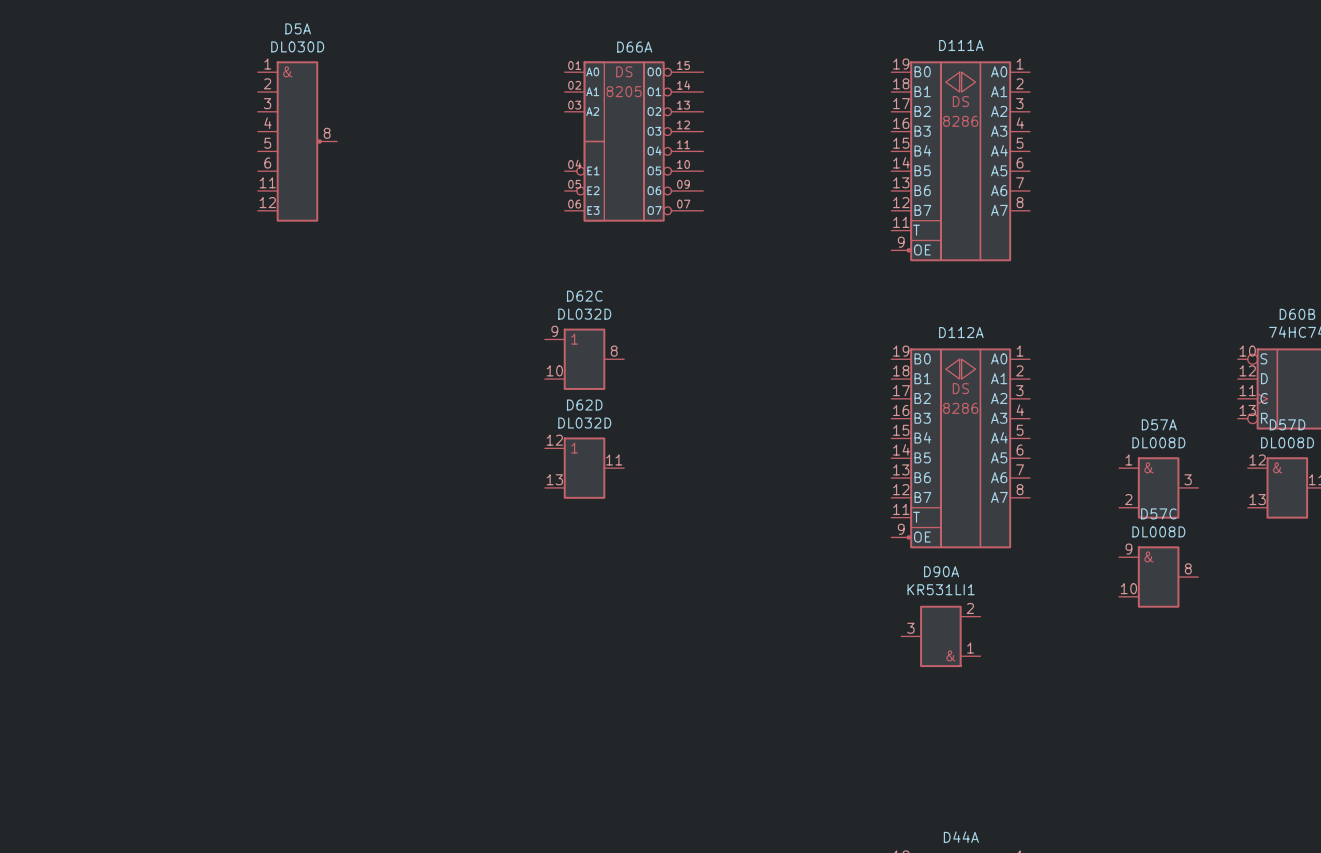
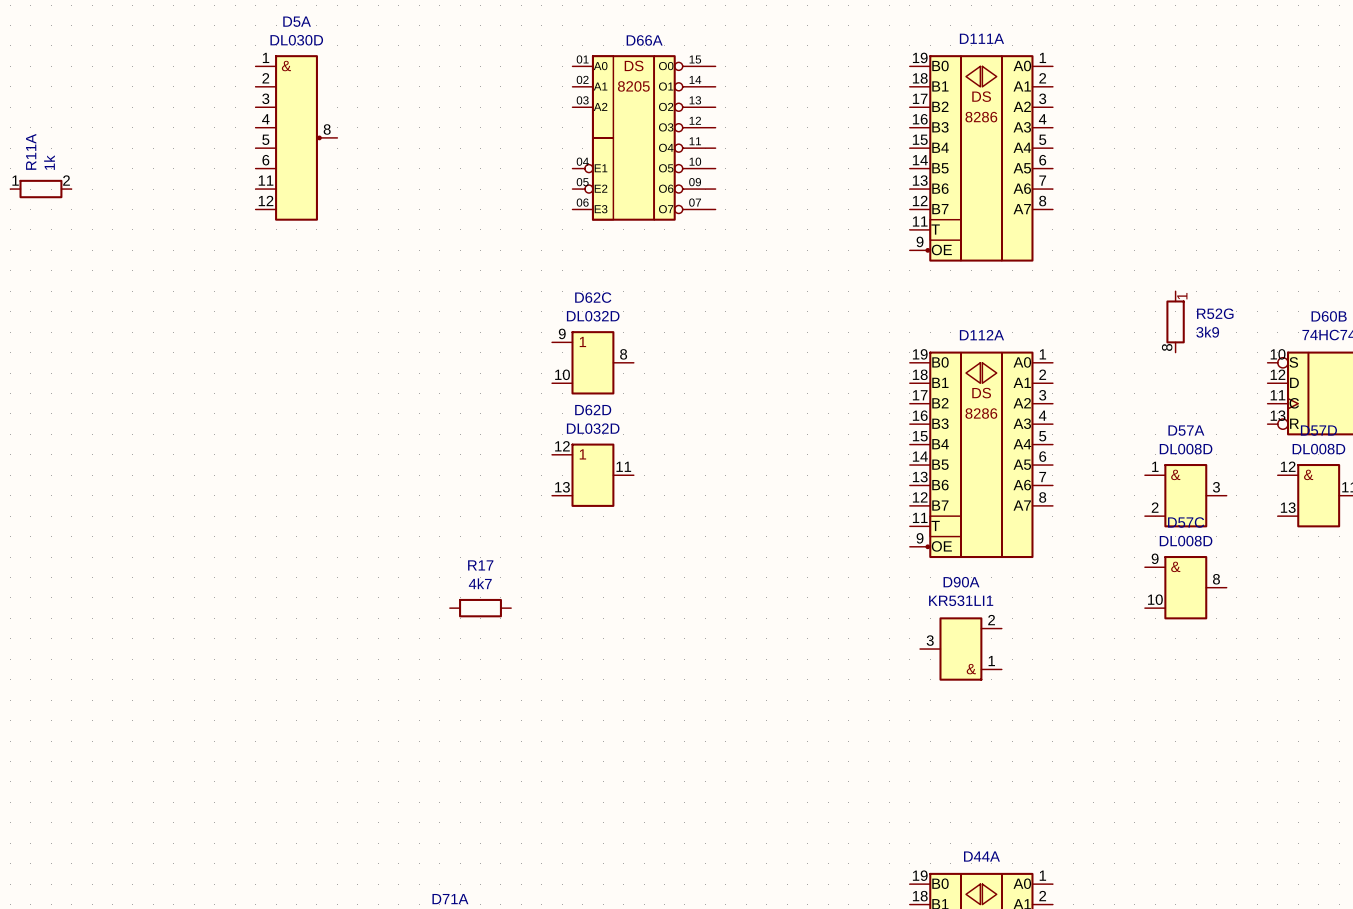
R11A: none -> 1k (40, 189)
R52G: none -> 3k9 (1175, 321)
R17: none -> 4k7 (480, 608)

